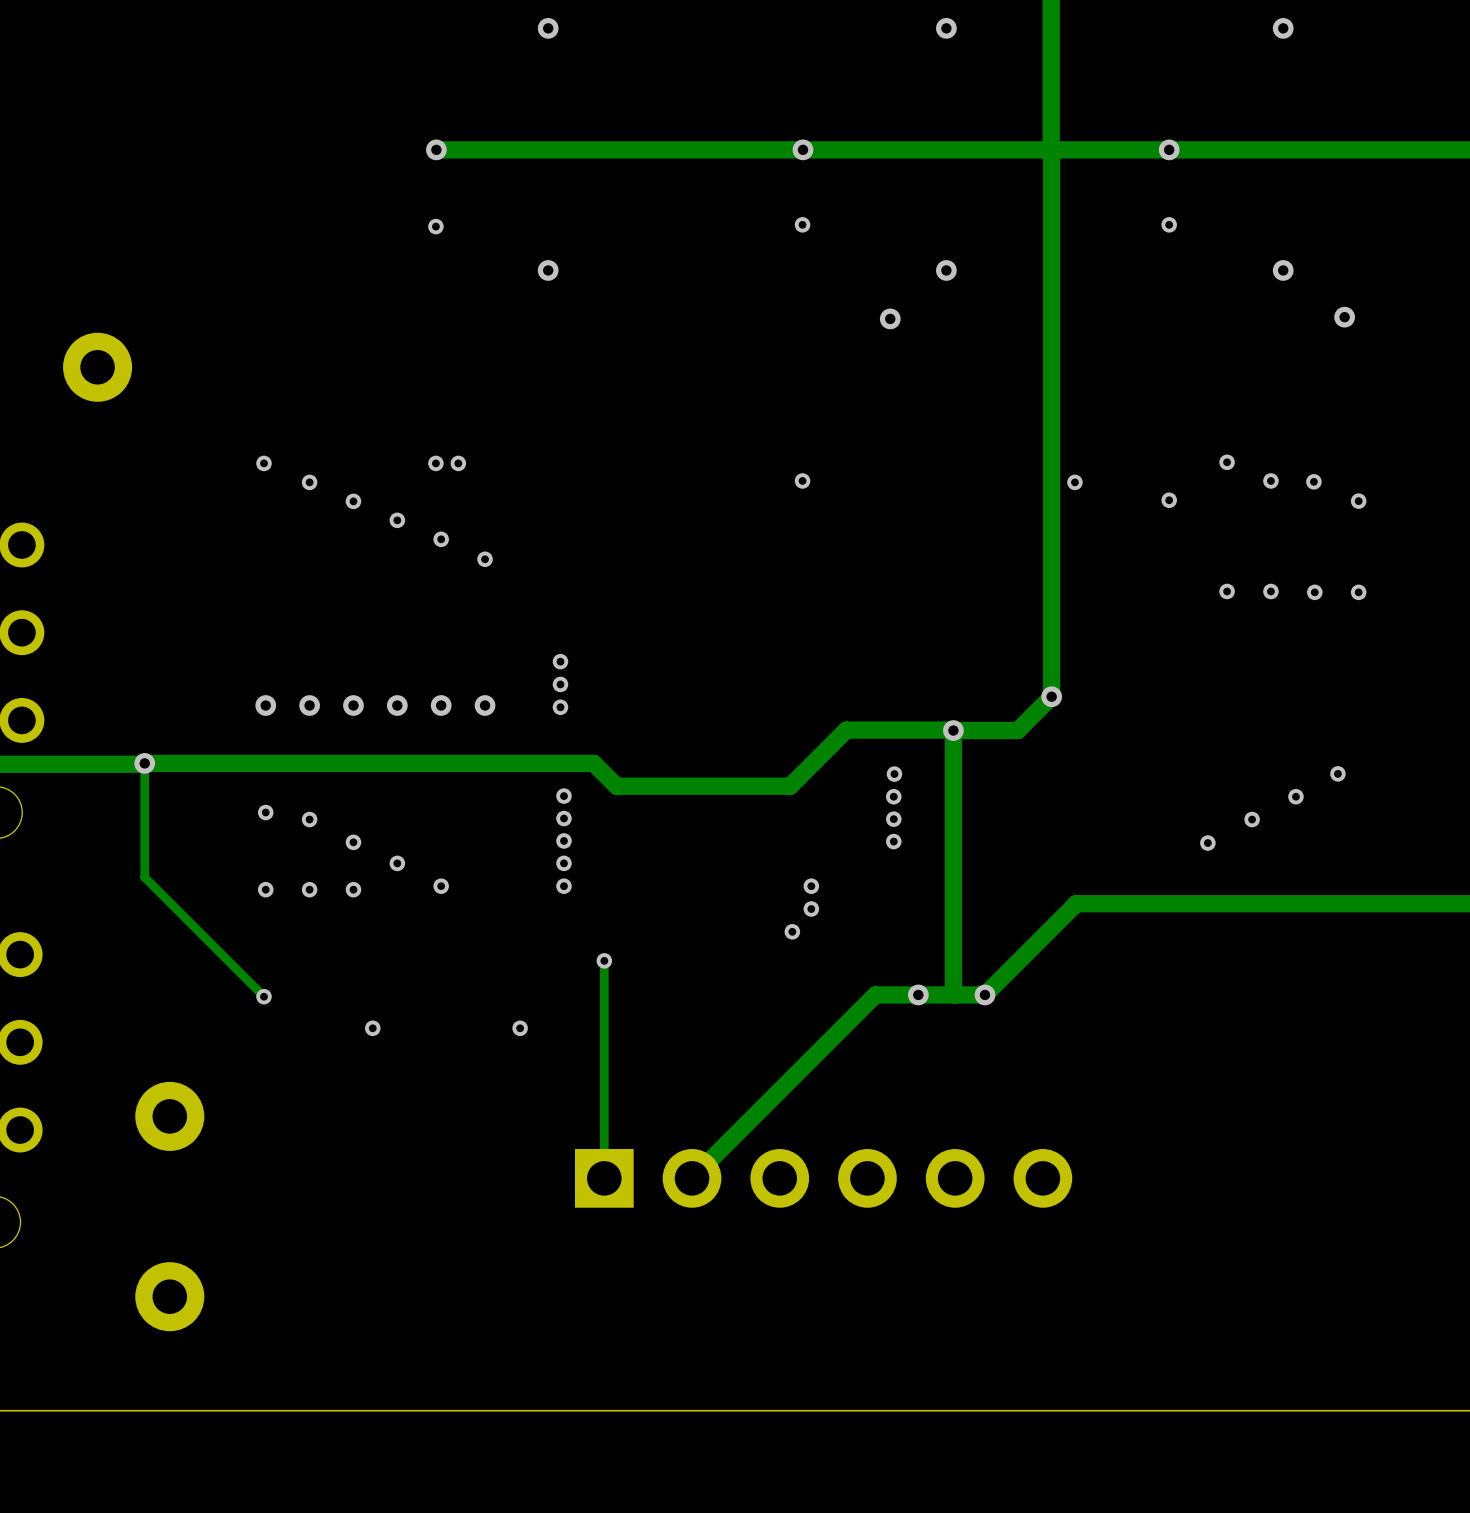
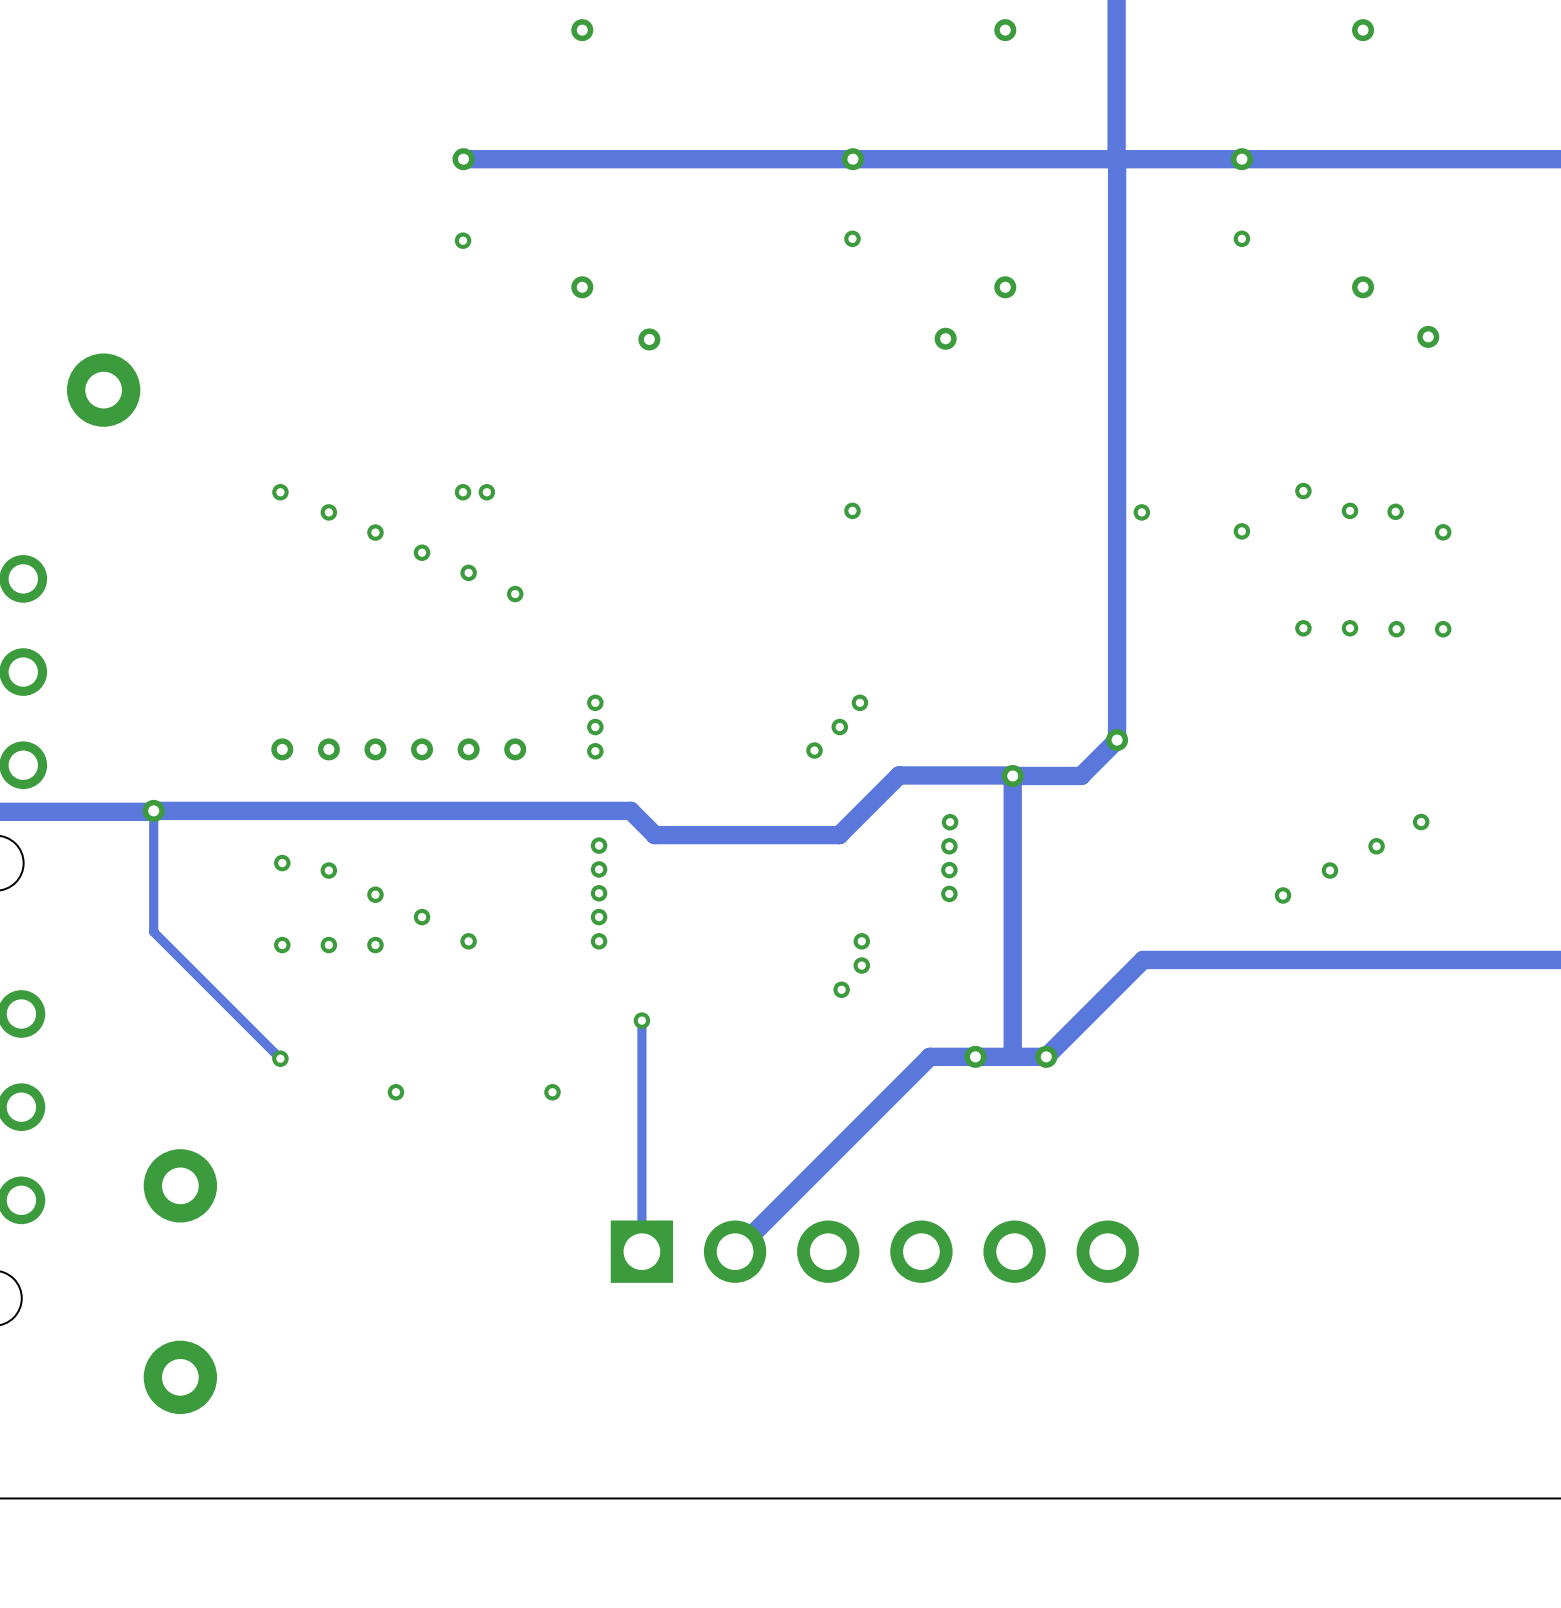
via: none -> (649, 339)
via: none -> (859, 702)
via: none -> (839, 727)
via: none -> (814, 750)

